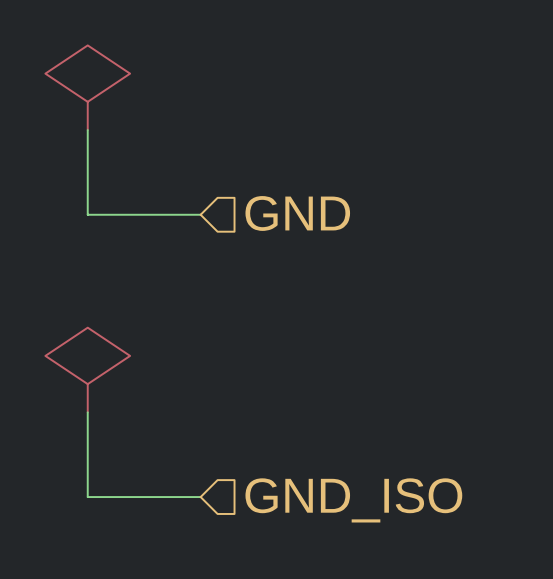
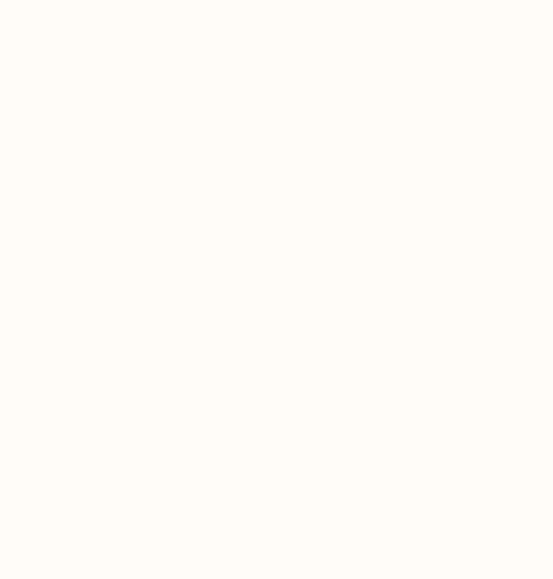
power symbol: (87, 87) -> none
wire: (87, 130) (87, 214) (200, 214) -> none
hierarchical label: GND (297, 213) -> none
power symbol: (87, 370) -> none
wire: (87, 412) (87, 497) (200, 497) -> none
hierarchical label: GND_ISO (353, 500) -> none

